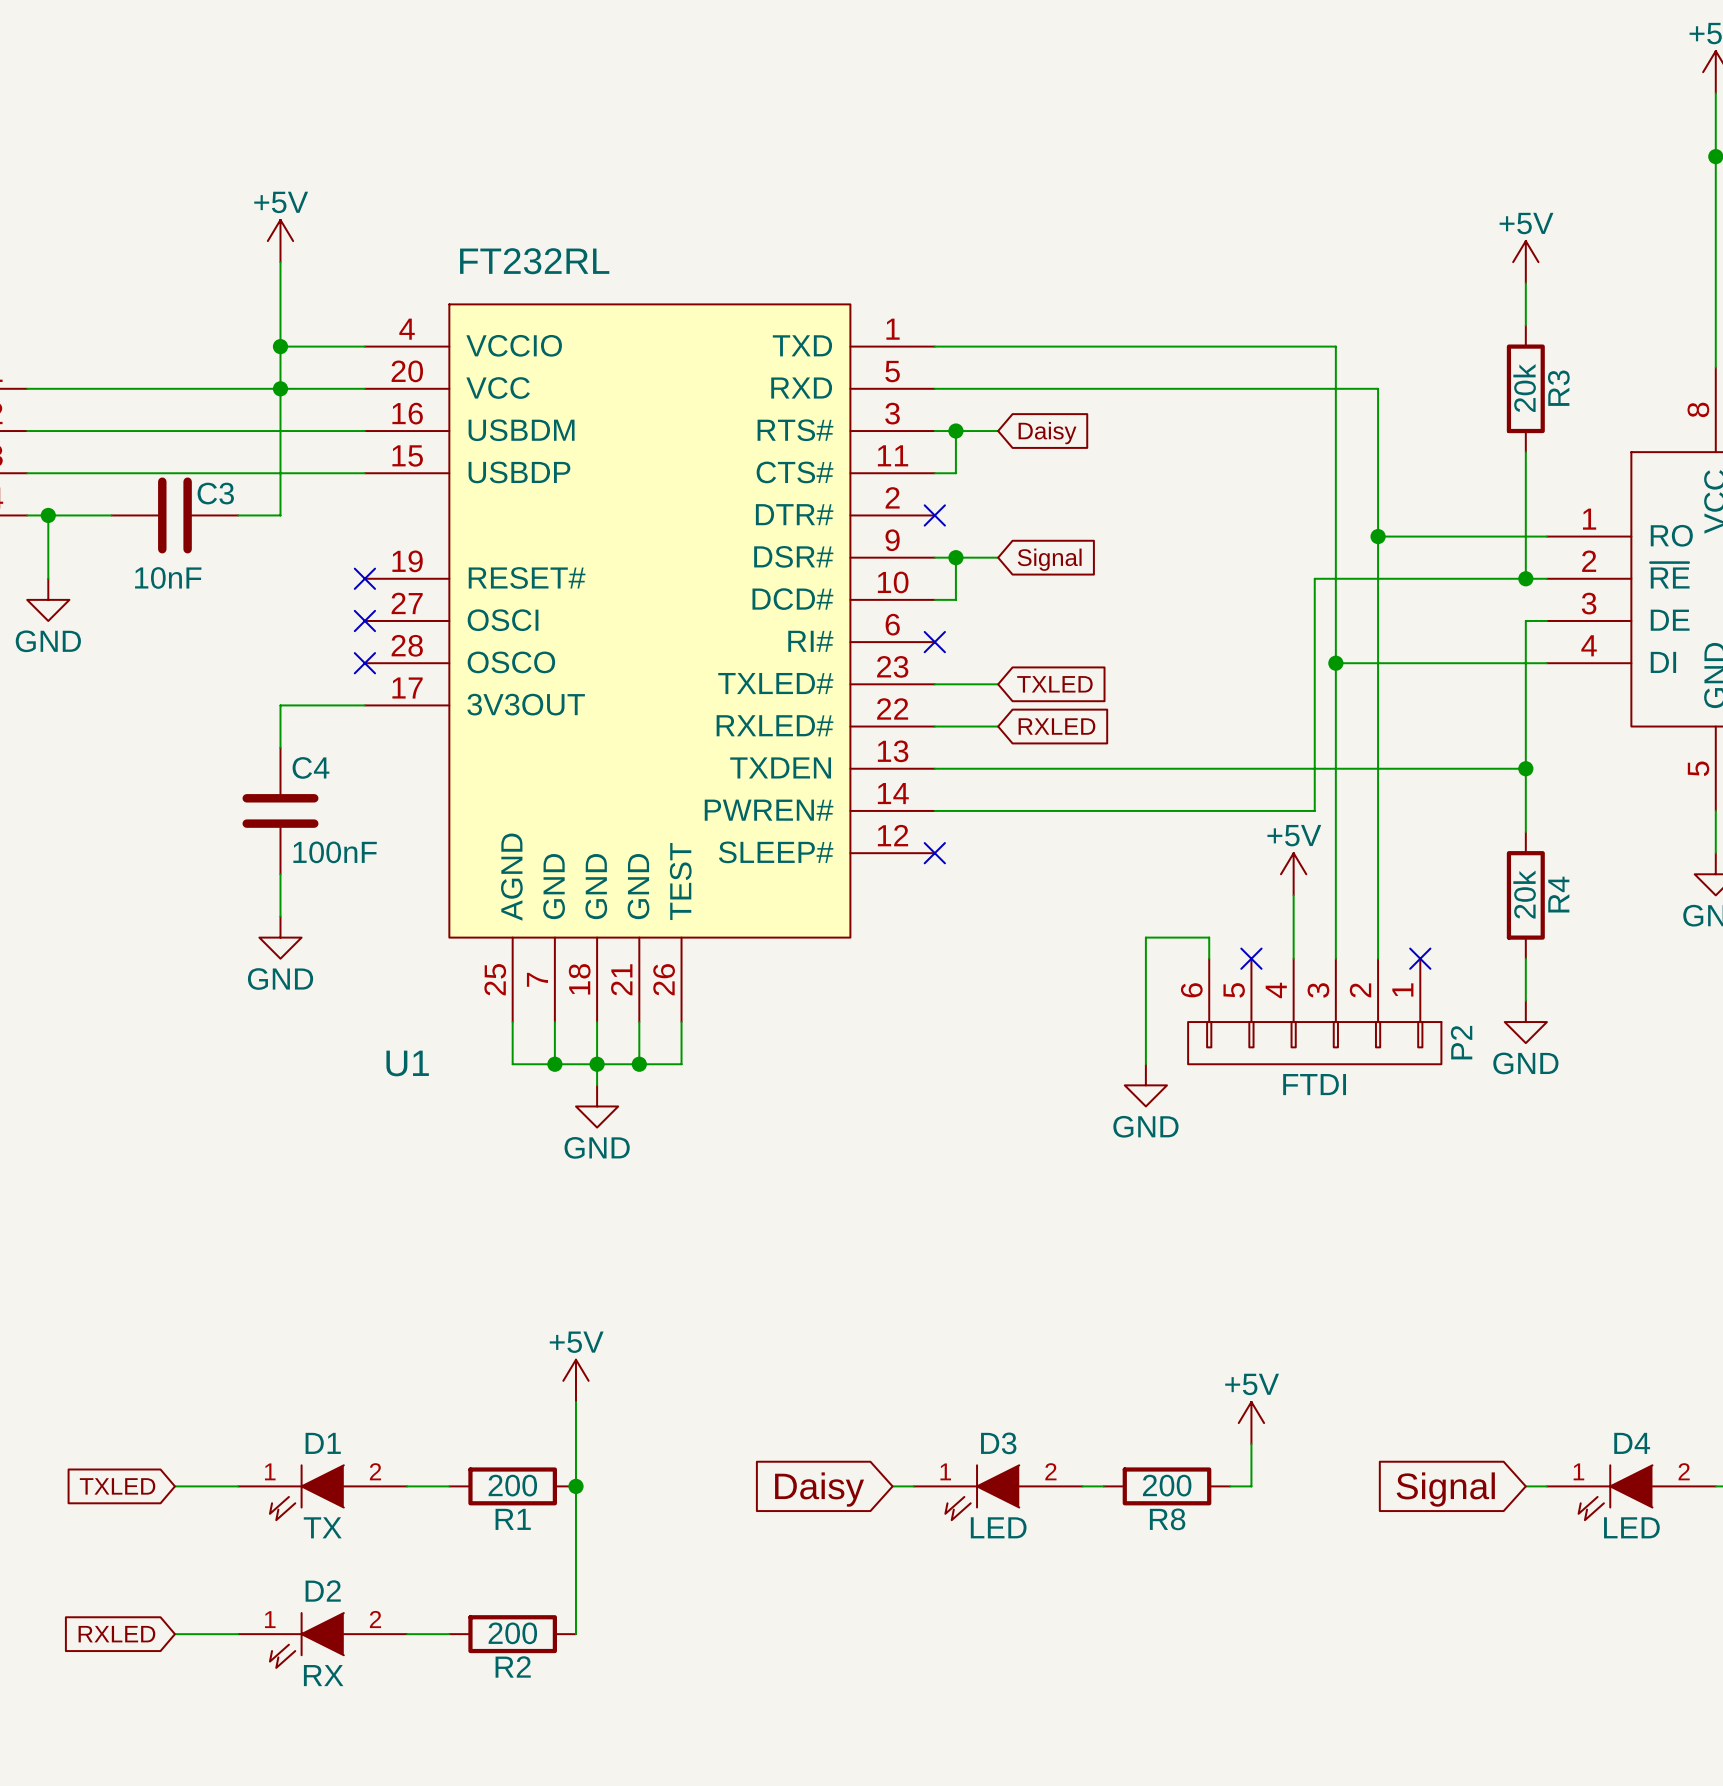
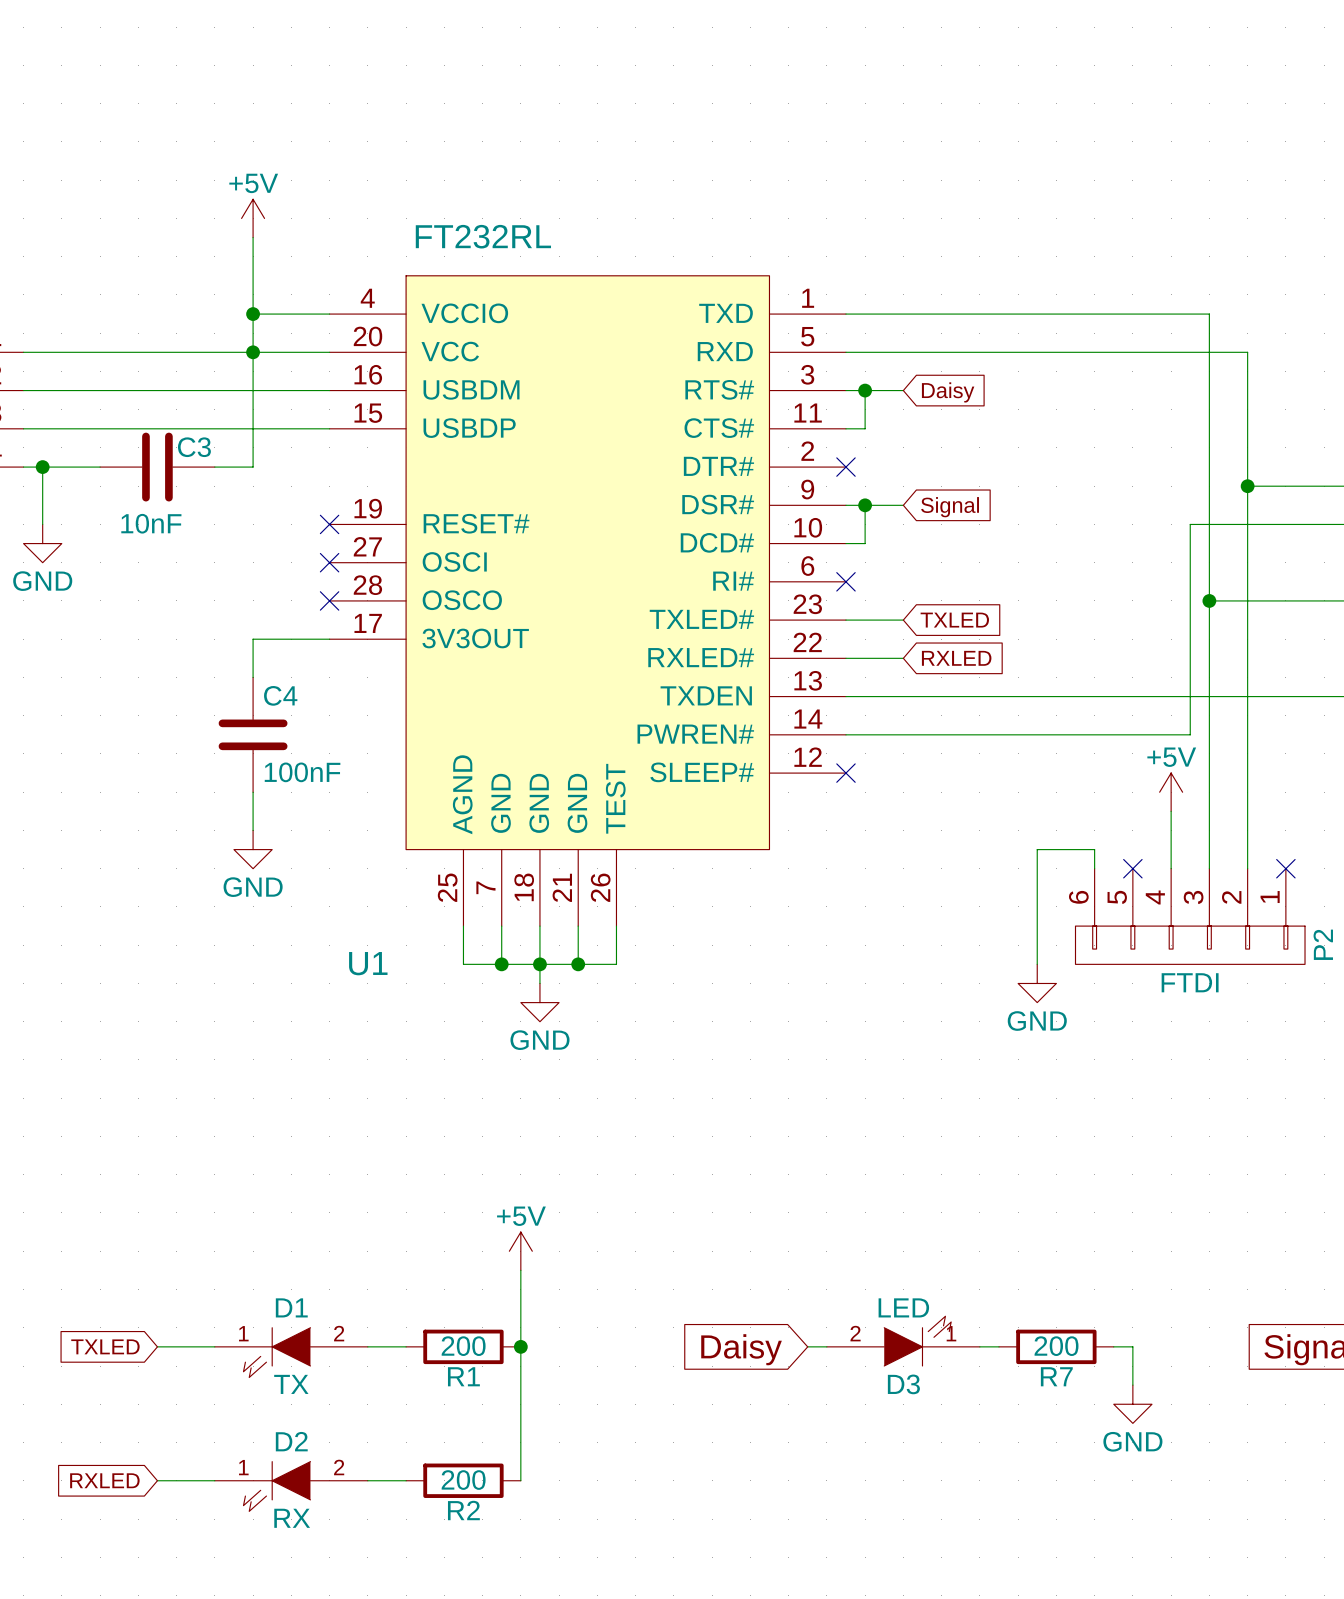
power symbol: +5V (1251, 1423) -> none
wire: (1251, 1444) (1251, 1486) -> (1132, 1385) (1132, 1346)
D3 rotation: 0° (982, 1492) -> 180° (917, 1341)
R8 name: R8 (1167, 1519) -> R7 (1056, 1376)
power symbol: none -> GND (1132, 1404)

